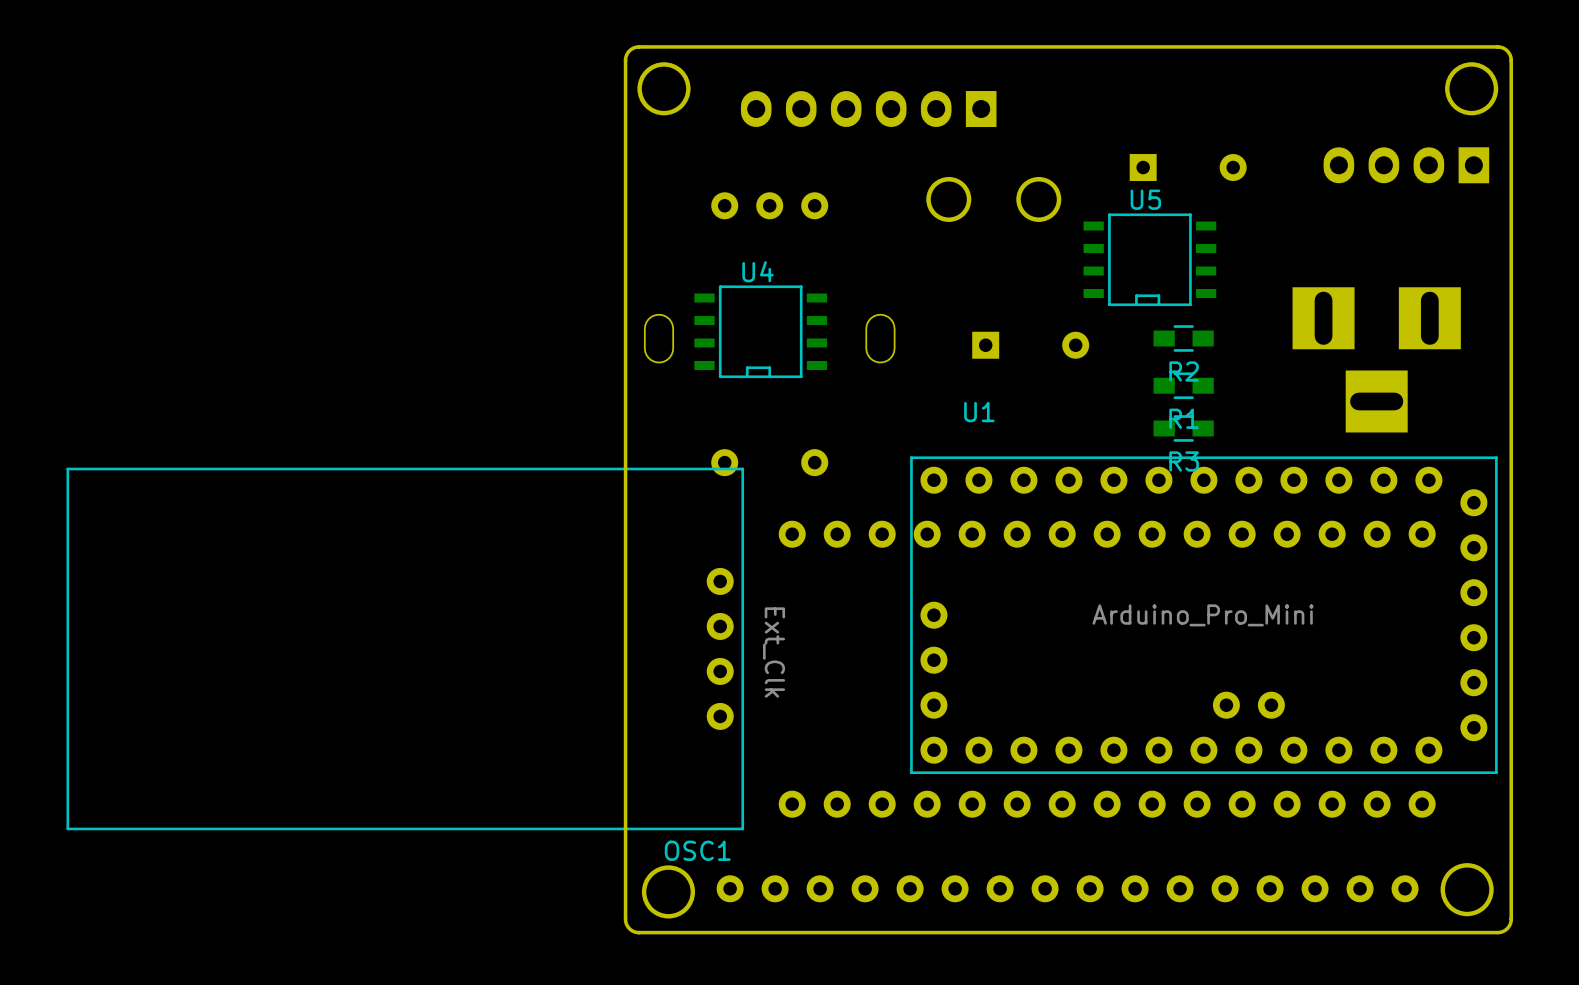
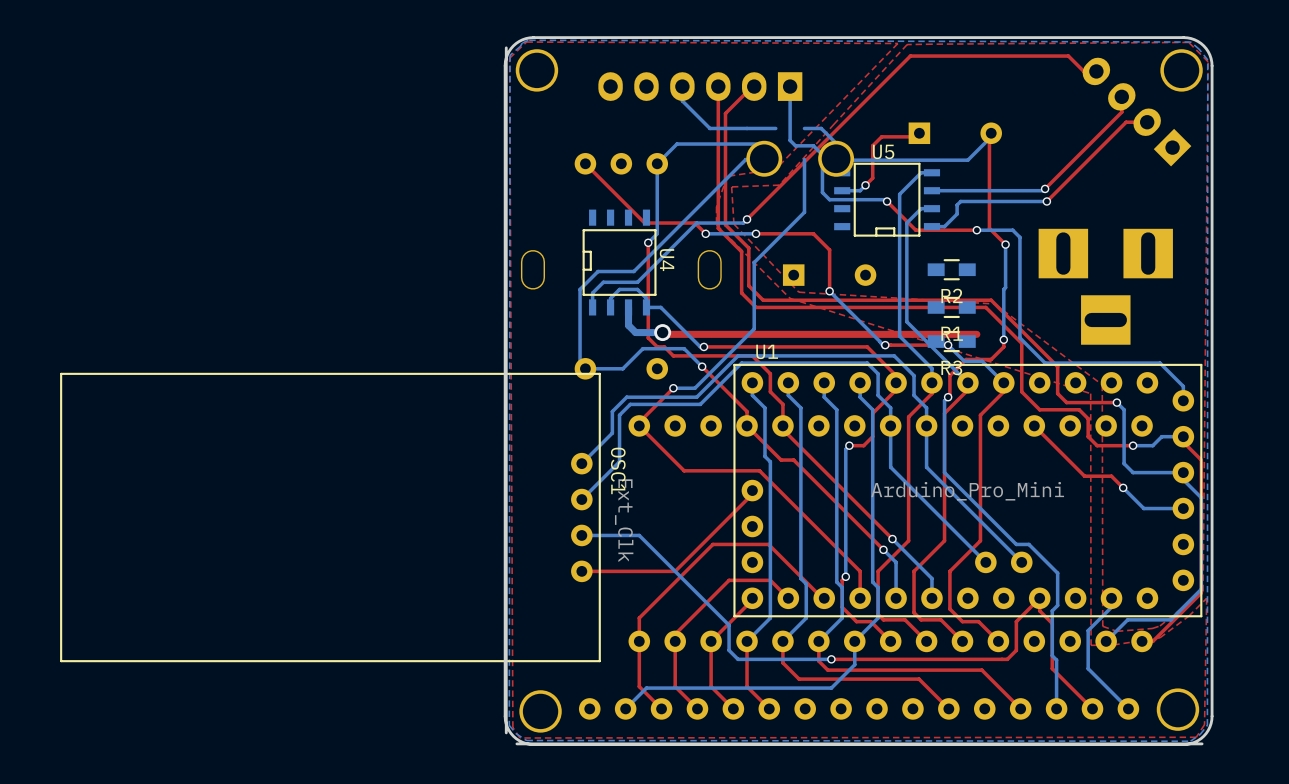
board edge: (1497, 46) (1507, 50) (1511, 60) -> none
board edge: (1497, 46) (639, 46) (629, 50) (625, 60) -> none
board edge: none -> (1183, 37) (533, 37) (522, 39) (513, 45) (507, 55) (505, 65) (505, 716) (507, 727) (513, 736) (522, 742) (533, 744) (1183, 744) (1194, 742) (1203, 736) (1209, 727) (1212, 716) (1212, 65) (1209, 55) (1203, 45) (1194, 39) (1183, 37)
bottom zone outline: none -> (528, 40) (1190, 42) (1199, 49) (1207, 60) (1207, 725) (1200, 734) (1190, 741) (526, 740) (516, 733) (509, 725) (510, 55) (522, 43) (528, 40)
top zone outline: none -> (526, 42) (509, 58) (512, 727) (520, 738) (1196, 737) (1204, 724) (1206, 598) (1188, 616) (1160, 637) (1113, 644) (1091, 645) (1090, 393) (790, 298) (716, 224) (716, 206) (727, 176) (775, 169) (897, 43) (526, 42)
top zone outline: none -> (1188, 42) (1208, 61) (1203, 591) (1160, 625) (1152, 628) (1116, 631) (1102, 626) (1102, 384) (994, 303) (798, 292) (733, 224) (731, 186) (779, 185) (907, 44) (1188, 42)
board edge: (1511, 60) (1511, 918) -> none
top track: none -> (1096, 71) (1083, 71) (1068, 56) (910, 56) (747, 219)
bottom track: none -> (682, 86) (682, 100) (709, 128) (775, 128)
top track: none -> (718, 86) (718, 228) (741, 251) (741, 293) (756, 307) (985, 307) (1021, 343) (1021, 391) (1039, 409) (1079, 409) (1088, 418) (1088, 436) (1097, 445) (1133, 445)
bottom track: none -> (791, 86) (790, 86) (790, 140) (795, 145) (813, 145) (822, 154) (822, 192) (829, 199) (885, 199) (887, 201)
top track: none -> (1121, 96) (1121, 112) (1045, 188)
top track: none -> (754, 97) (754, 86) (752, 86) (725, 113) (725, 224) (748, 248) (748, 285) (763, 300) (991, 300) (1057, 366) (1057, 393) (1066, 402) (1116, 402)
part: none -> (1137, 112)
top track: none -> (1147, 122) (1126, 122) (1046, 201)
bottom track: none -> (804, 128) (821, 128) (852, 160) (967, 160) (989, 136)
part: (1406, 165) -> none
top track: none -> (917, 136) (881, 136) (872, 145) (872, 178) (865, 185)
top track: none -> (989, 136) (989, 228) (1005, 244)
bottom track: none -> (747, 159) (633, 271) (598, 271) (580, 289) (580, 363) (585, 368) (622, 368) (642, 348) (684, 348) (702, 366)
bottom track: none -> (775, 159) (775, 156) (763, 144) (677, 144) (657, 163) (657, 233) (648, 242)
bottom track: none -> (804, 159) (804, 212) (754, 262) (754, 328) (694, 388) (673, 388)
top track: none -> (585, 163) (644, 223) (694, 223) (705, 233)
bottom track: none -> (931, 172) (921, 172) (899, 194) (899, 336) (931, 368) (931, 382)
bottom track: none -> (865, 185) (860, 190) (842, 190)
via: none -> (865, 185)
bottom track: none -> (1045, 188) (1043, 190) (931, 190)
via: none -> (1045, 188)
top track: none -> (887, 201) (915, 230) (976, 230)
via: none -> (887, 201)
bottom track: none -> (1046, 201) (960, 201) (957, 205) (957, 214) (944, 226) (931, 226)
via: none -> (1046, 201)
U5 position: (1149, 259) -> (887, 199)
bottom track: none -> (931, 208) (921, 208) (906, 223) (906, 321) (967, 382)
bottom track: none -> (747, 219) (743, 223) (696, 223) (637, 282) (603, 282) (592, 293) (592, 307)
via: none -> (747, 219)
bottom track: none -> (976, 230) (1012, 230) (1019, 237) (1019, 337) (1045, 363) (1160, 363) (1183, 386) (1183, 400)
via: none -> (976, 230)
via: none -> (705, 233)
bottom track: none -> (756, 233) (705, 233)
top track: none -> (756, 233) (813, 233) (829, 249) (829, 291)
via: none -> (756, 233)
top track: none -> (648, 242) (648, 337) (657, 346) (664, 346) (673, 355) (752, 355) (770, 373) (770, 391) (782, 404) (782, 429) (892, 539)
via: none -> (648, 242)
bottom track: none -> (1005, 244) (1003, 339)
via: none -> (1005, 244)
U4 rotation: 0° (760, 331) -> 90° clockwise (619, 262)
bottom track: none -> (829, 291) (883, 346) (885, 345)
via: none -> (829, 291)
bottom track: none -> (610, 307) (610, 298) (619, 289) (637, 289) (646, 298) (646, 307) (660, 307) (700, 346) (703, 346)
bottom track: none -> (628, 307) (628, 325) (635, 332) (662, 332)
U1 name position: U1 (979, 412) -> U1 (767, 351)
top track: none -> (662, 332) (664, 334) (976, 334)
via: none -> (662, 332)
top track: none -> (1003, 339) (1003, 346) (991, 359) (966, 359) (949, 375) (949, 395) (948, 397)
via: none -> (1003, 339)
via: none -> (885, 345)
bottom track: none -> (948, 345) (964, 361) (982, 361) (1003, 382)
top track: none -> (948, 345) (885, 345)
via: none -> (948, 345)
top track: none -> (703, 346) (867, 346) (896, 375) (896, 391)
via: none -> (703, 346)
top track: none -> (702, 366) (747, 411) (747, 425) (781, 460) (793, 460) (883, 549)
via: none -> (702, 366)
bottom track: none -> (752, 382) (752, 395) (764, 407) (764, 456) (770, 461) (770, 618) (747, 641)
bottom track: none -> (788, 382) (788, 395) (800, 407) (800, 578) (806, 583) (806, 618) (782, 641)
bottom track: none -> (824, 382) (824, 397) (836, 409) (836, 582) (842, 587) (842, 618) (818, 641)
bottom track: none -> (860, 382) (860, 397) (872, 409) (872, 582) (878, 587) (878, 618) (854, 641) (854, 664) (831, 688) (646, 688) (625, 708)
top track: none -> (931, 382) (931, 393) (908, 416) (908, 540) (878, 571) (878, 614) (883, 619) (905, 619) (926, 641)
top track: none -> (967, 382) (967, 390) (944, 413) (944, 540) (914, 571) (914, 612) (921, 619) (940, 619) (962, 641)
top track: none -> (1003, 382) (1003, 391) (980, 415) (980, 540) (949, 571) (949, 609) (962, 621) (978, 621) (998, 641)
top track: none -> (673, 388) (639, 422) (639, 425) (684, 470) (759, 470) (860, 571) (860, 598)
via: none -> (673, 388)
top track: none -> (896, 390) (872, 413) (872, 436) (863, 445) (849, 445)
bottom track: none -> (948, 397) (944, 400) (944, 472) (1016, 544) (1028, 544) (1057, 573) (1057, 605) (1052, 610) (1052, 655) (1056, 660) (1056, 708)
via: none -> (948, 397)
bottom track: none -> (1116, 402) (1124, 409) (1124, 463) (1133, 472) (1183, 472) (1183, 479) (1201, 497) (1201, 589) (1170, 619) (1127, 619) (1106, 641)
via: none -> (1116, 402)
top track: none -> (1034, 427) (1034, 425) (1084, 476) (1111, 476) (1123, 487)
bottom track: none -> (1183, 436) (1161, 436) (1152, 445) (1133, 445)
top track: none -> (1183, 436) (1183, 442) (1201, 460) (1201, 592) (1152, 641) (1142, 641)
bottom track: none -> (849, 445) (845, 449) (845, 576)
via: none -> (849, 445)
via: none -> (1133, 445)
bottom track: none -> (581, 463) (612, 433) (612, 411) (626, 397) (696, 397) (738, 355) (894, 355) (914, 375) (914, 395) (926, 407) (926, 467) (1021, 562)
bottom track: none -> (1123, 487) (1143, 508) (1183, 508)
via: none -> (1123, 487)
top track: none -> (752, 490) (752, 494) (675, 571) (581, 571)
bottom track: none -> (581, 499) (619, 461) (619, 415) (630, 404) (700, 404) (741, 363) (867, 363) (878, 373) (878, 395) (890, 407) (890, 467) (985, 562)
bottom track: none -> (581, 535) (639, 535) (729, 625) (729, 650) (738, 659) (831, 659)
bottom track: none -> (892, 539) (931, 578) (931, 598)
via: none -> (892, 539)
bottom track: none -> (883, 549) (896, 562) (896, 598)
via: none -> (883, 549)
top track: none -> (845, 576) (842, 580) (842, 607) (856, 621) (870, 621) (890, 641)
via: none -> (845, 576)
top track: none -> (752, 598) (711, 641) (711, 686) (733, 708)
top track: none -> (788, 598) (770, 580) (729, 580) (675, 634) (675, 686) (697, 708)
top track: none -> (824, 598) (768, 544) (712, 544) (639, 618) (639, 686) (661, 708)
bottom track: none -> (1111, 598) (1111, 607) (1088, 630) (1088, 668) (1128, 708)
top track: none -> (747, 641) (747, 686) (769, 708)
top track: none -> (782, 641) (782, 662) (799, 679) (919, 679) (948, 708)
top track: none -> (818, 641) (818, 661) (827, 670) (981, 670) (1020, 708)
top track: none -> (831, 659) (1007, 659) (1016, 650) (1016, 621) (1039, 598) (1039, 610) (1052, 623) (1052, 668) (1092, 708)
via: none -> (831, 659)
OSC1 name rotation: 0° (697, 850) -> 90° clockwise (618, 470)
OSC1 name position: OSC1 (697, 850) -> OSC1 (618, 470)
board edge: (625, 919) (629, 928) (639, 932) -> none
board edge: (1511, 919) (1507, 928) (1497, 932) -> none

